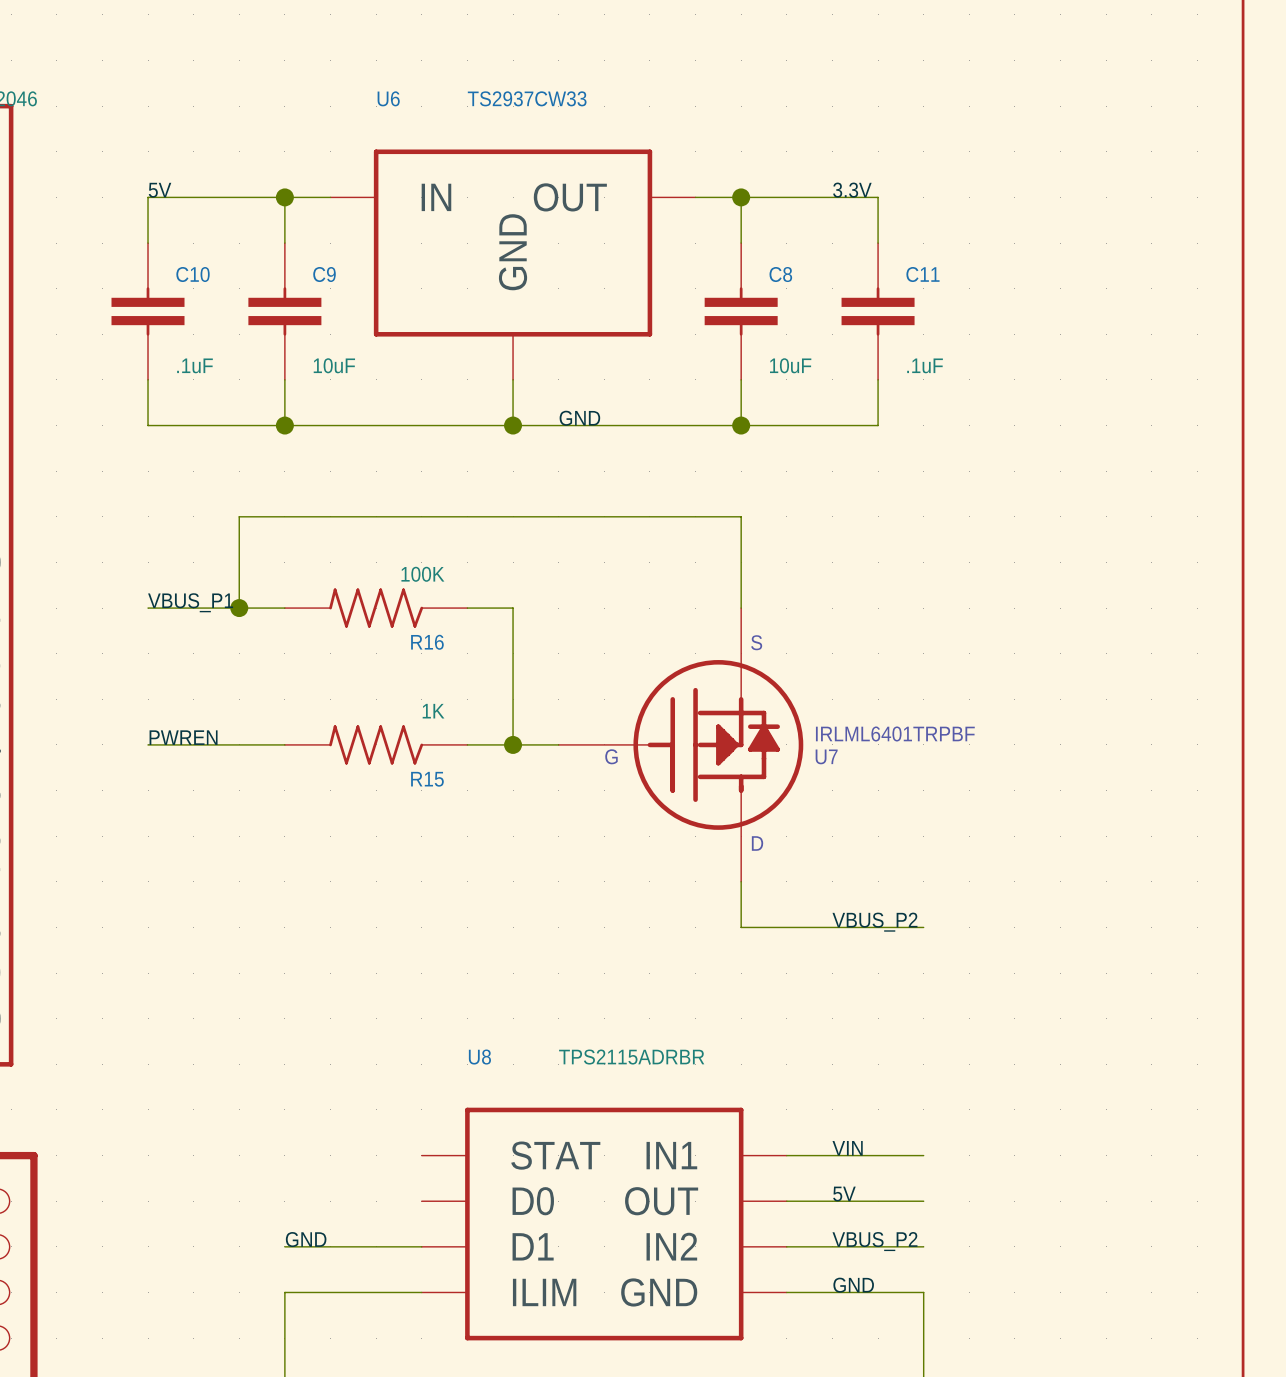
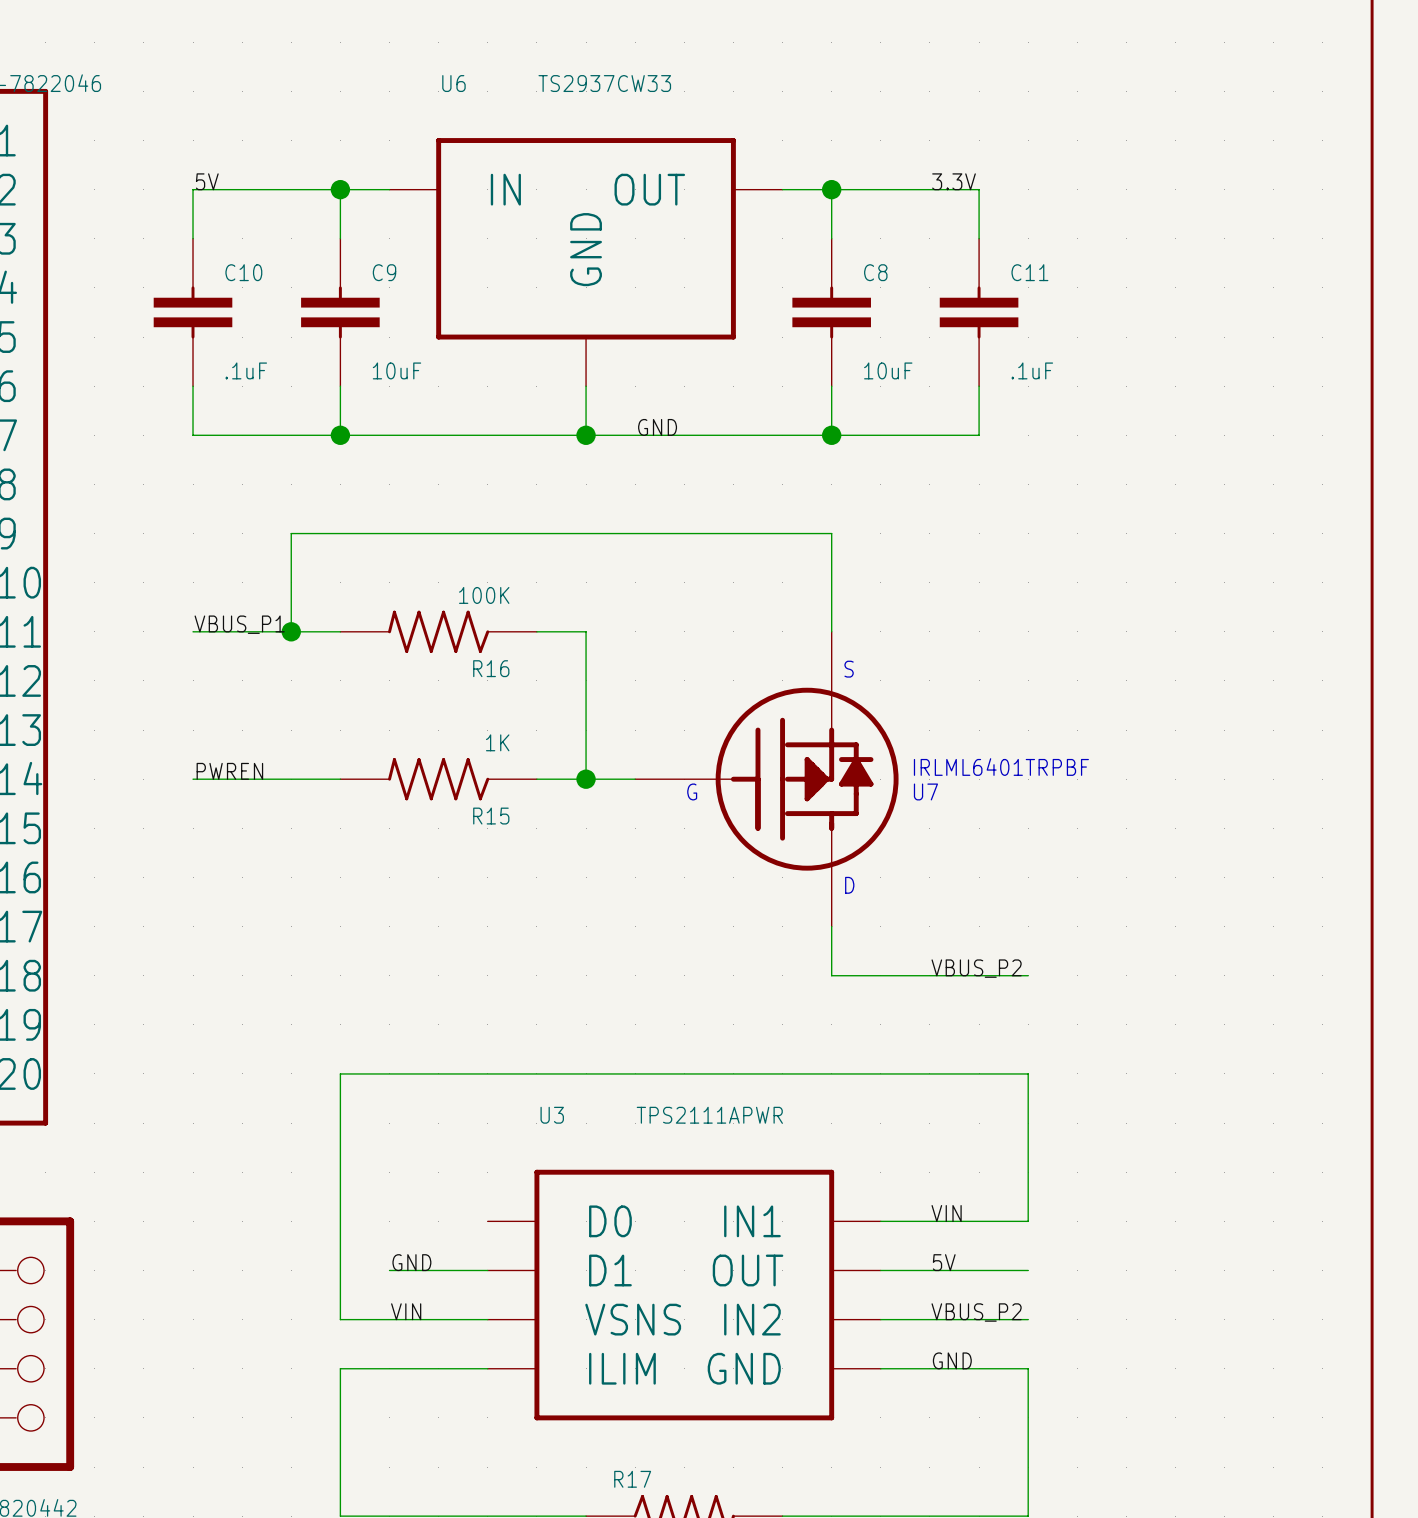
U8 name: U8 (479, 1057) -> U3 (552, 1115)
U8 value: TPS2115ADRBR (631, 1057) -> TPS2111APWR (709, 1115)
U8 pin name: STAT (555, 1155) -> D0 (610, 1221)
wire: none -> (1028, 1221) (1028, 1073) (340, 1073) (340, 1319)
wire: none -> (389, 1270) (487, 1270)
U8 pin name: D0 (533, 1201) -> D1 (610, 1270)
label position: GND (306, 1239) -> GND (411, 1262)
label: none -> VIN (406, 1311)
U8 pin name: D1 (533, 1246) -> VSNS (633, 1319)

